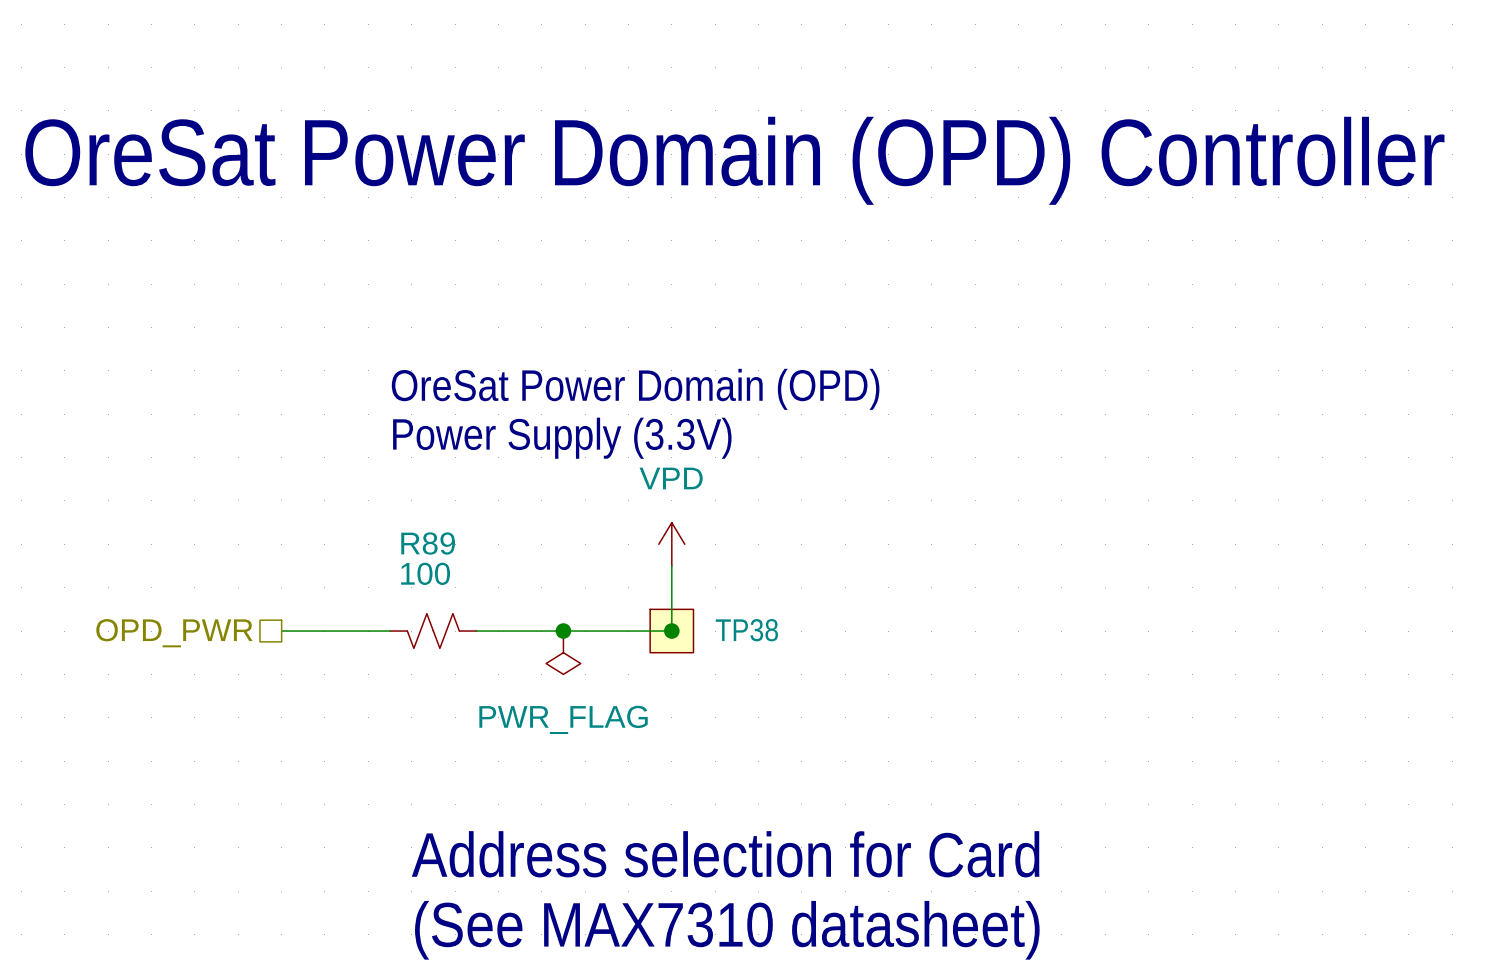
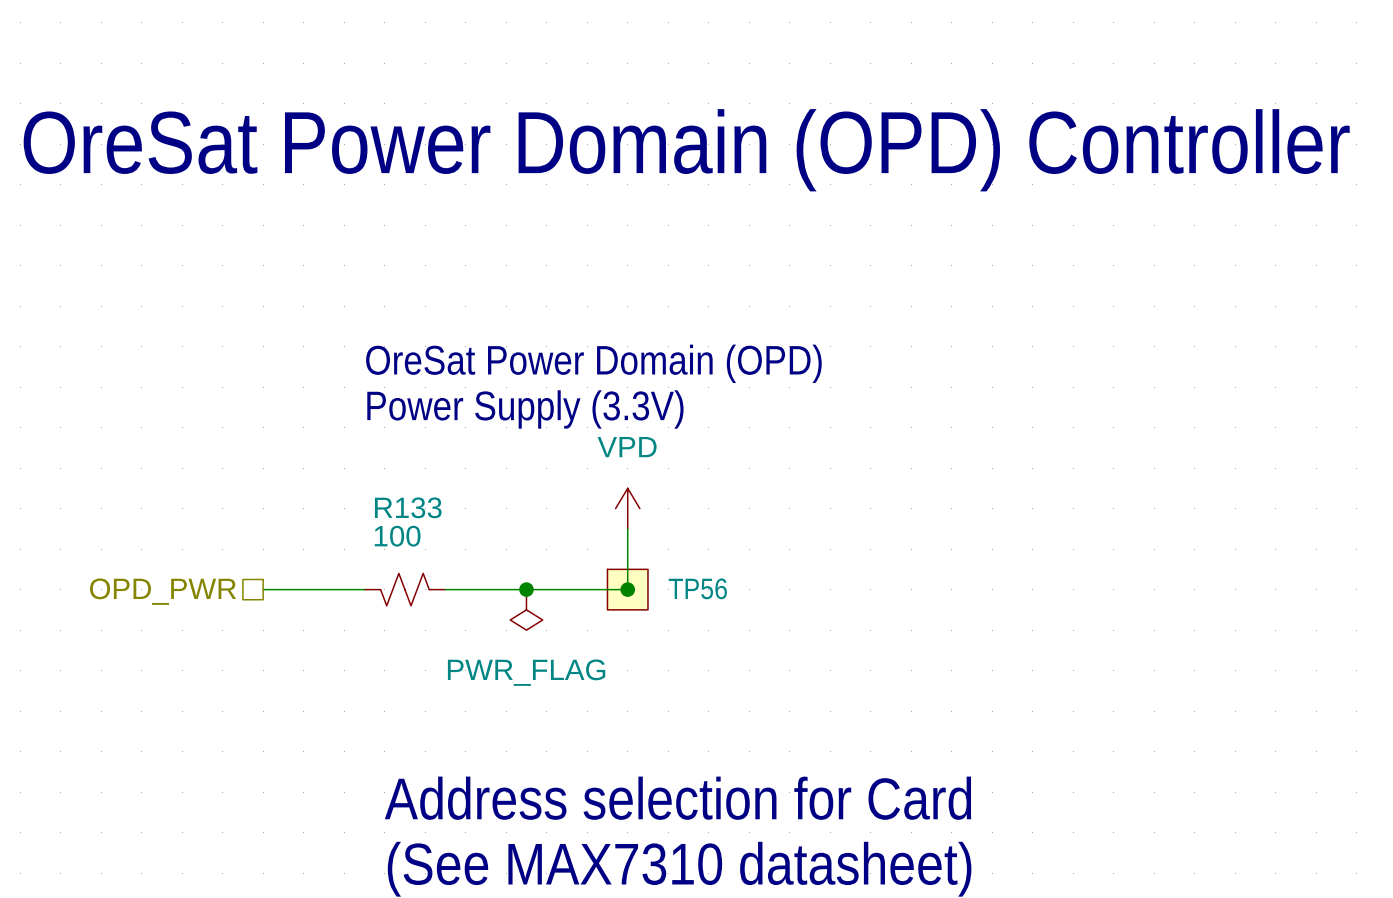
R89 name: R89 (428, 543) -> R133 (408, 507)
TP38 name: TP38 (746, 630) -> TP56 (697, 588)

